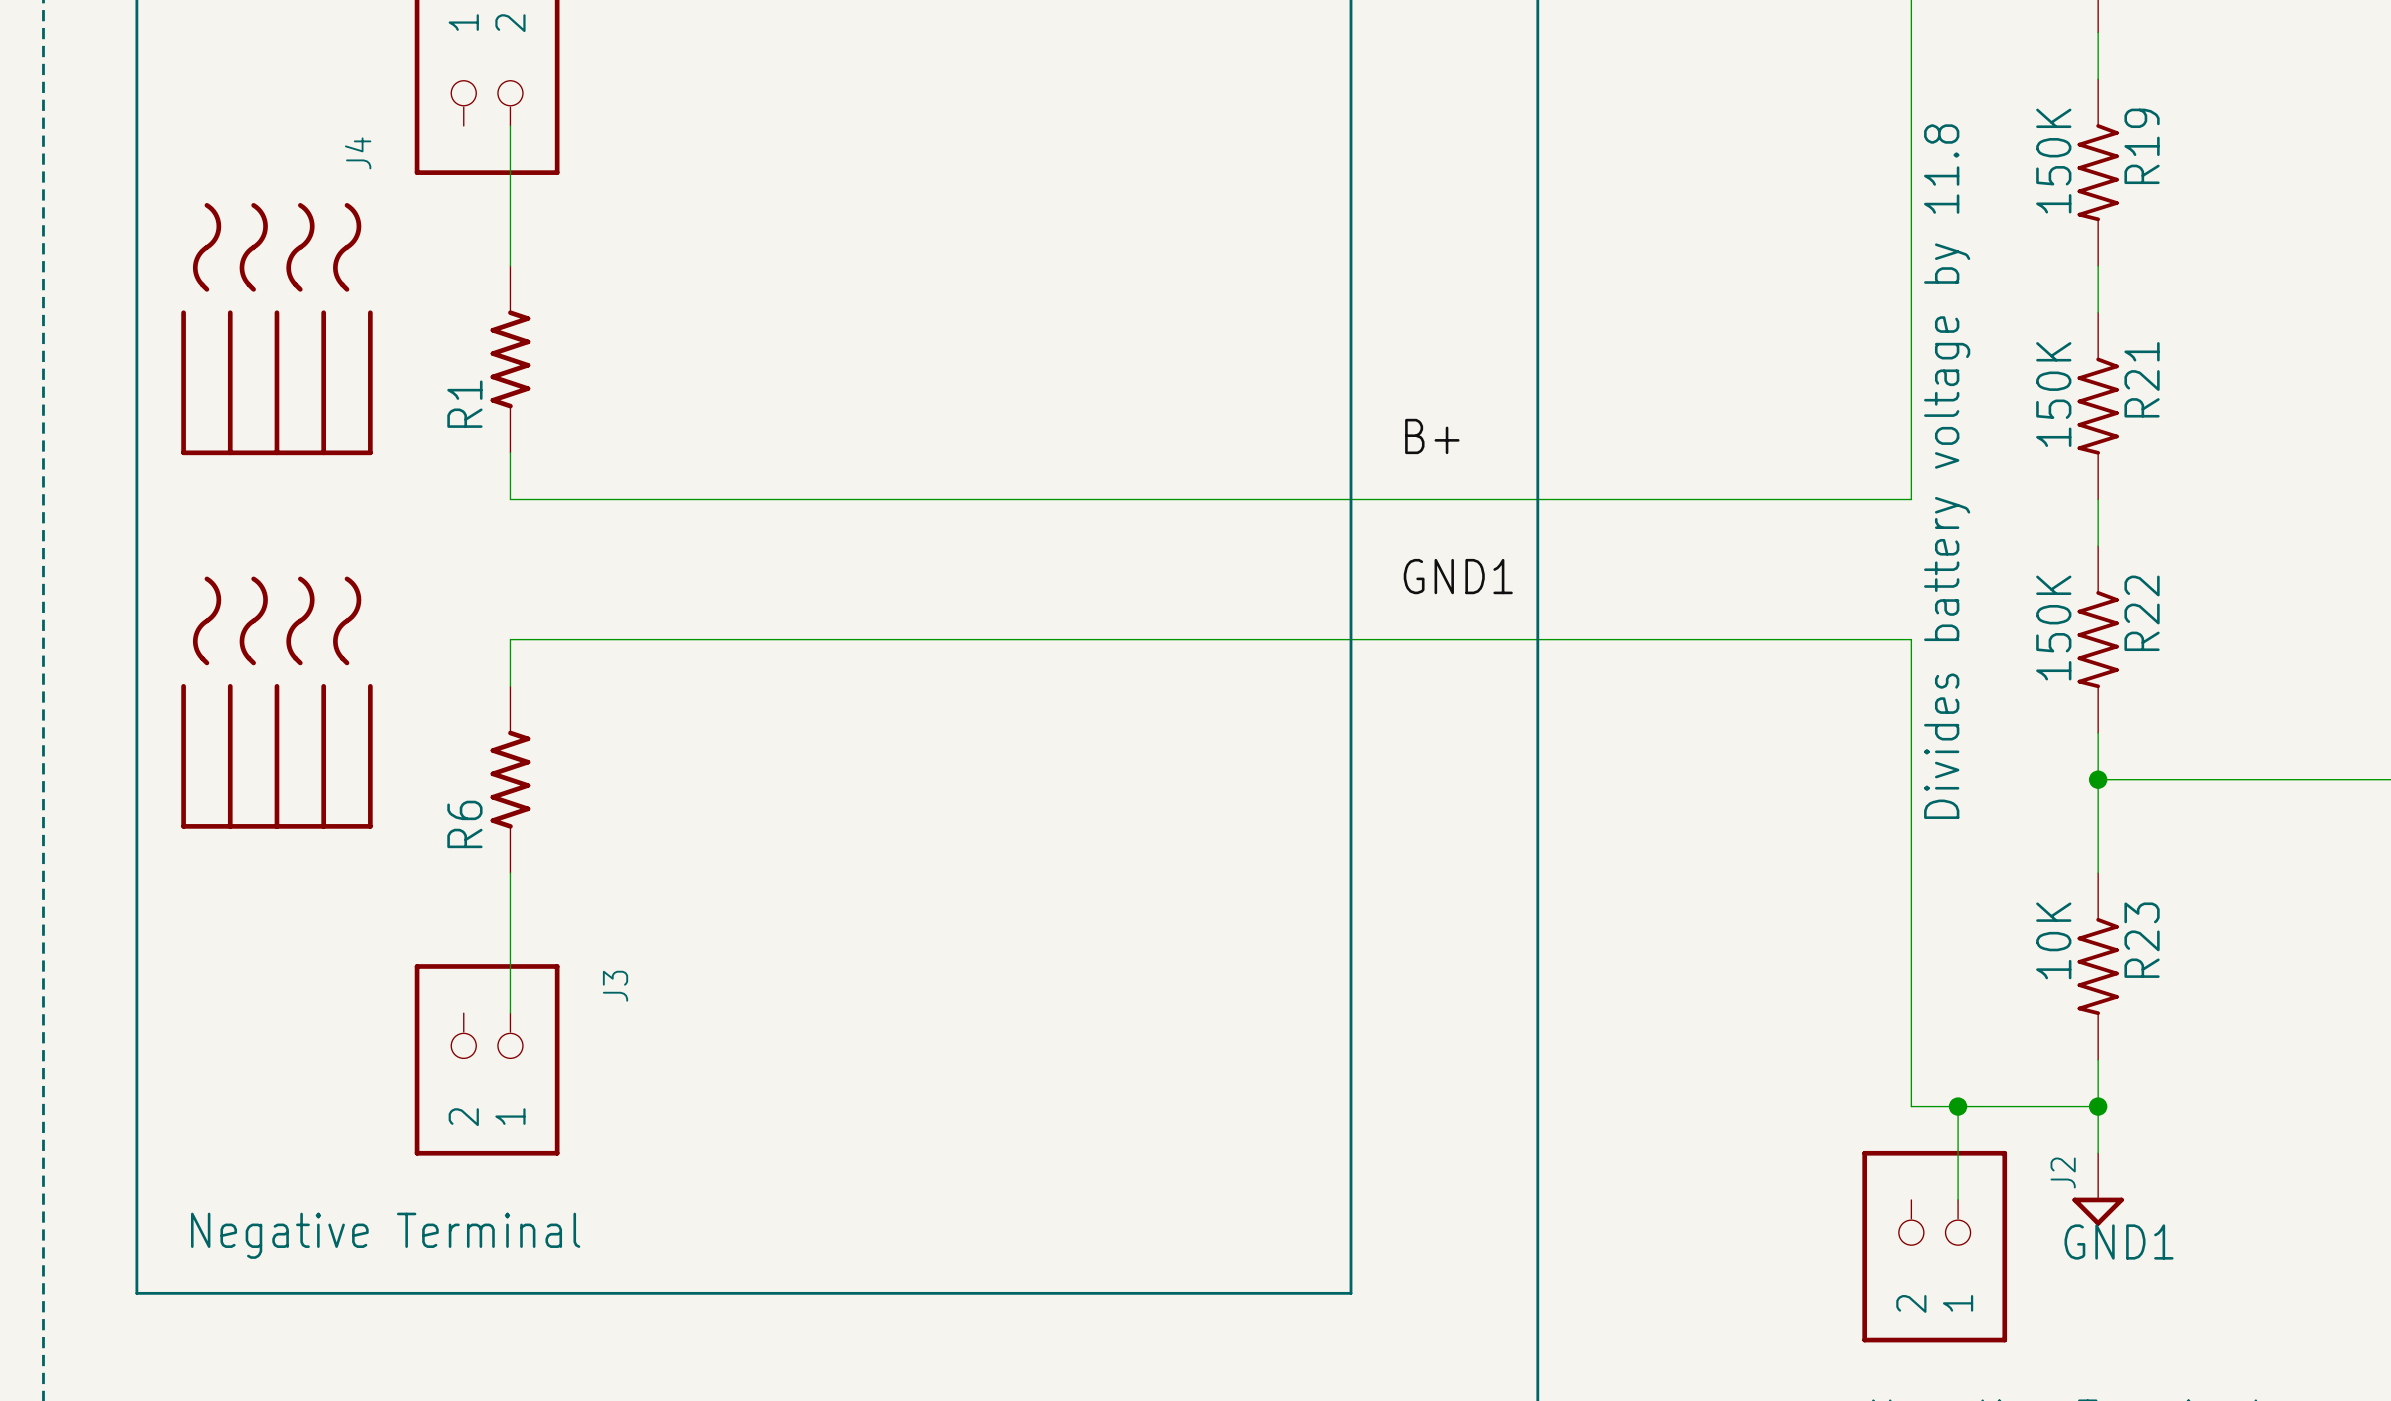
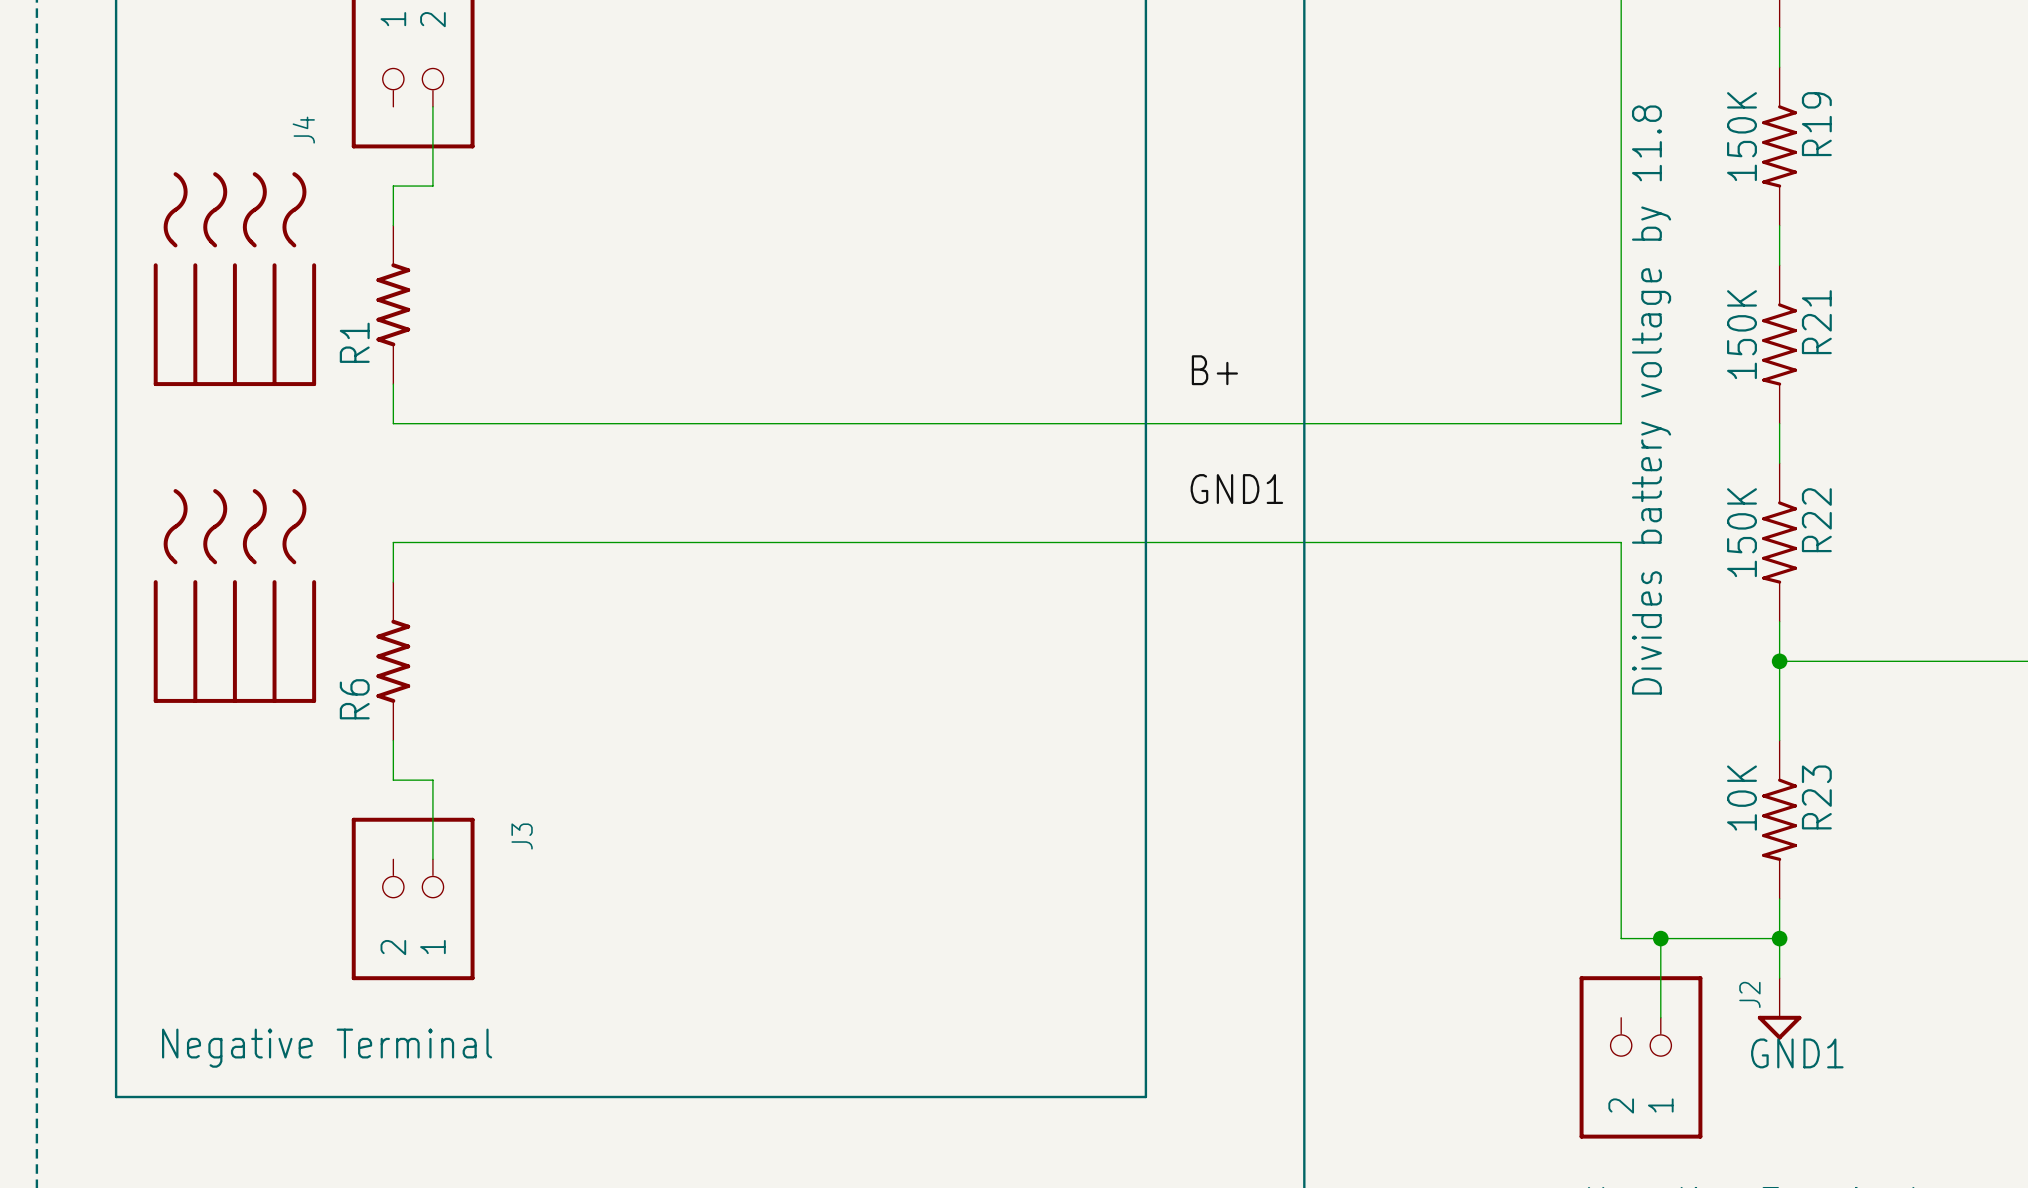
wire: (510, 219) (510, 266) -> (432, 186) (393, 186) (393, 225)
R1 position: (510, 359) -> (393, 304)
wire: (510, 452) (510, 499) -> (393, 384) (393, 423) (432, 423)
wire: (510, 639) (510, 686) -> (432, 542) (393, 542) (393, 582)
R6 position: (510, 779) -> (393, 661)
wire: (510, 873) (510, 919) -> (393, 740) (393, 780) (432, 780)

